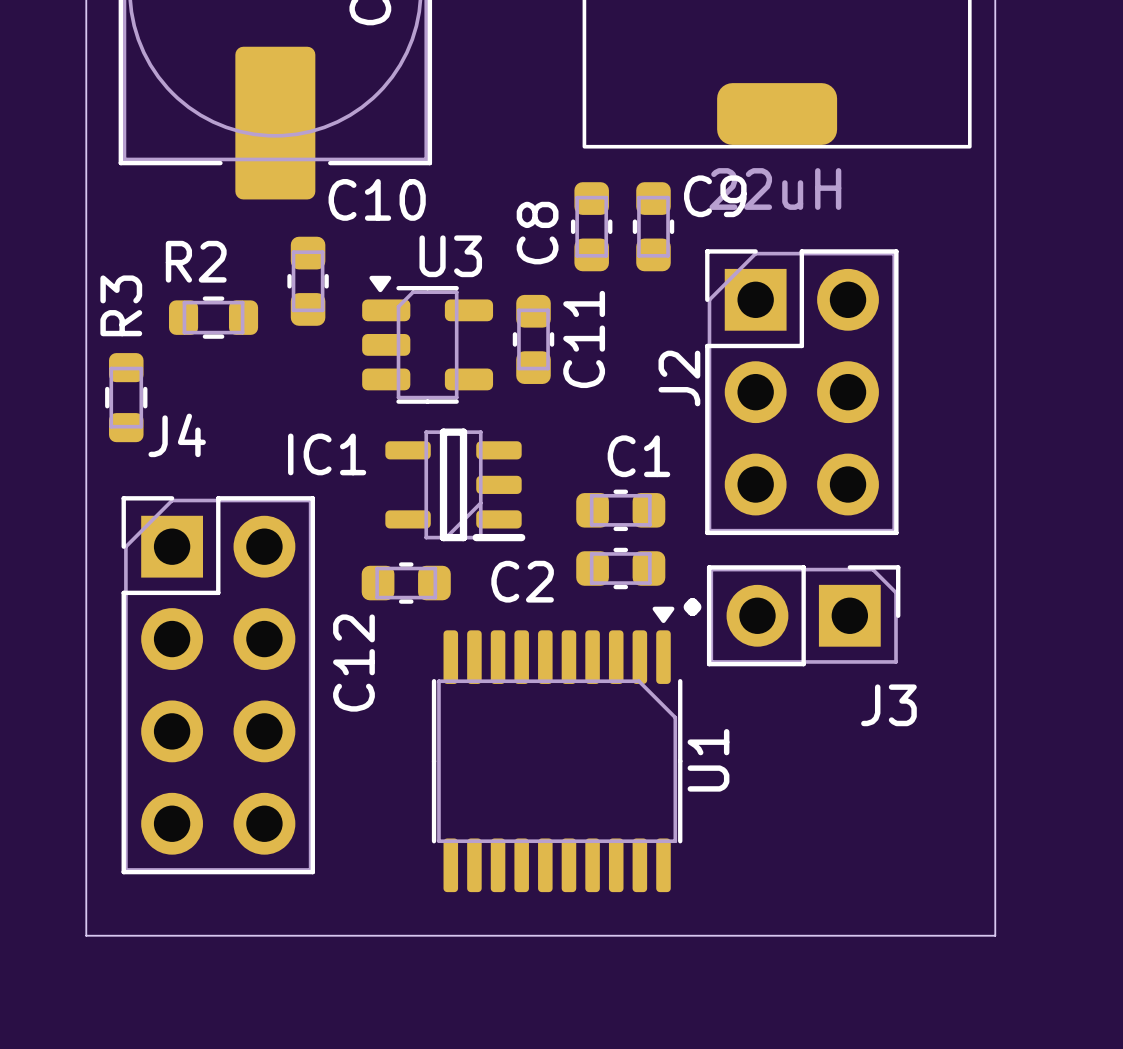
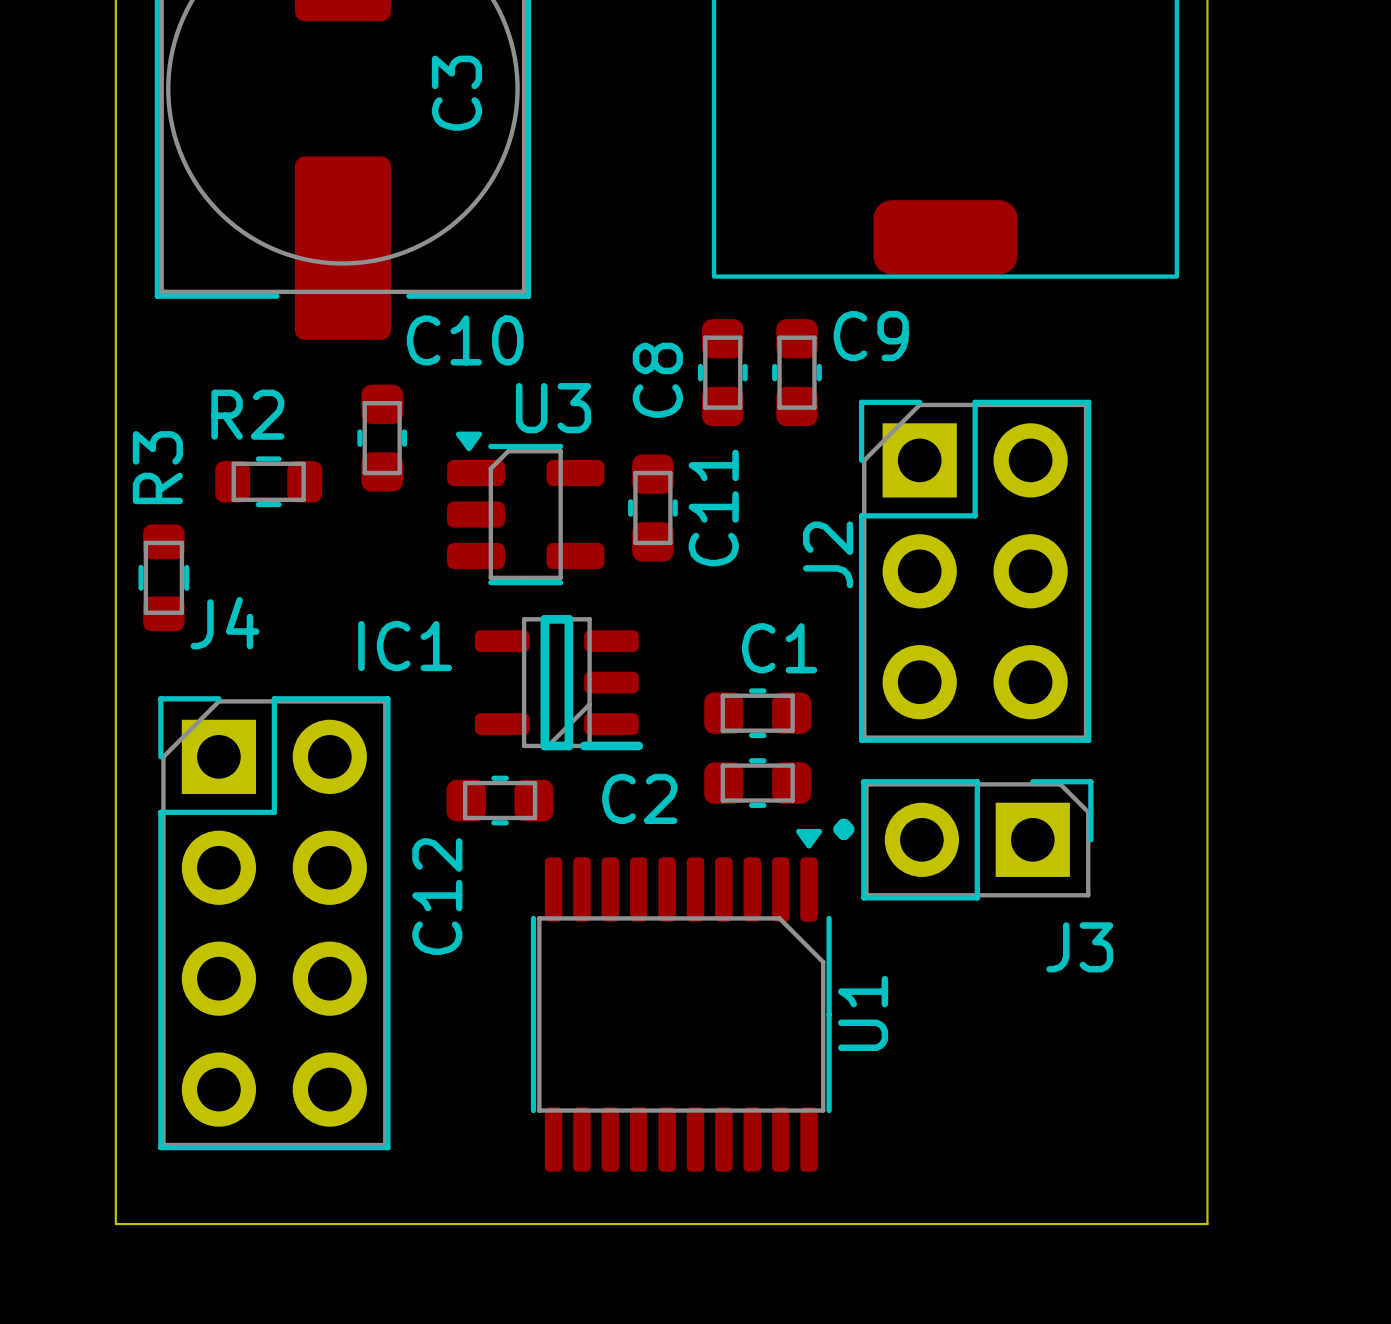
part value: 22uH (775, 189) -> none

